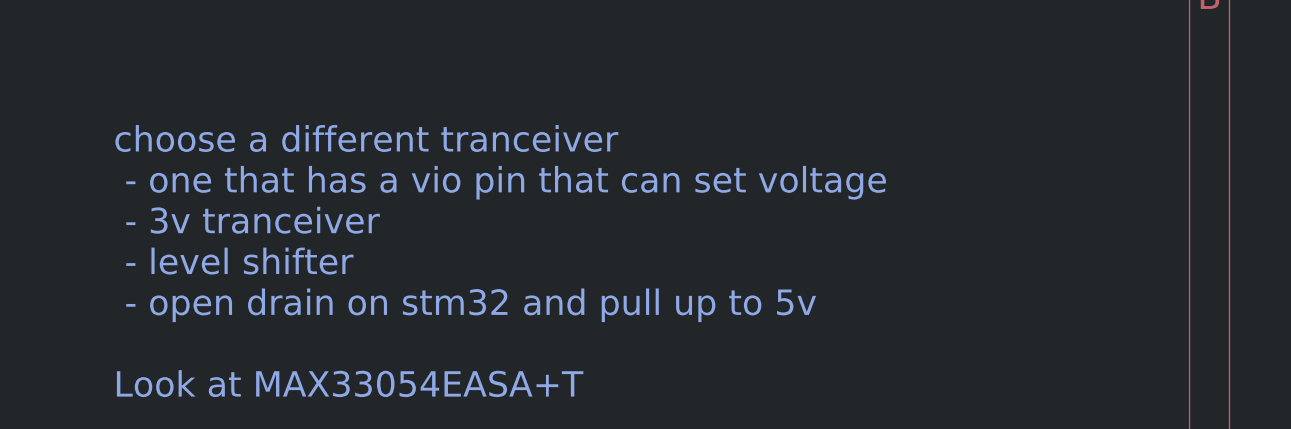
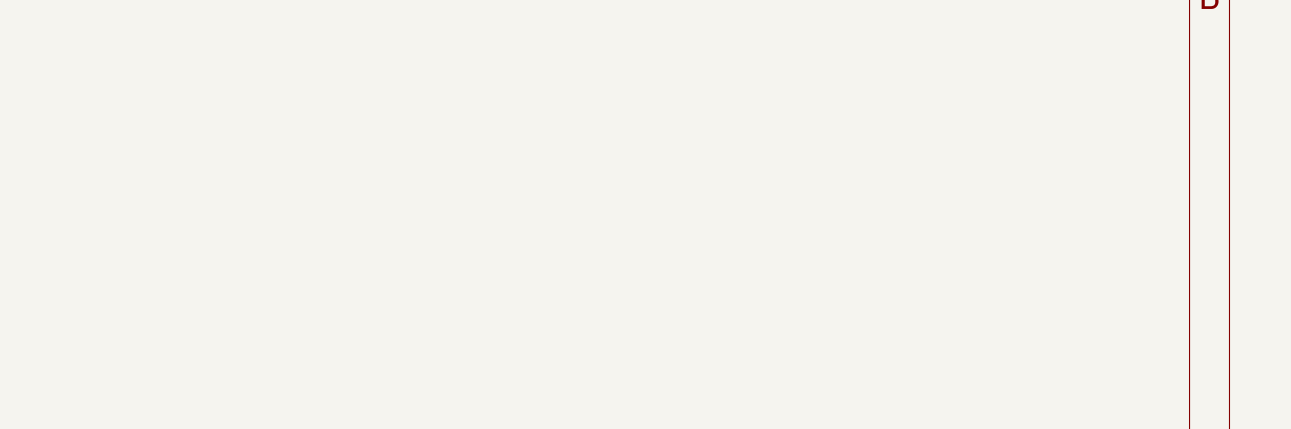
text: choose a different tranceiver (366, 138) -> none
text: - one that has a vio pin that can set voltage (506, 182) -> none
text: - 3v tranceiver (253, 220) -> none
text: - level shifter (239, 261) -> none
text: - open drain on stm32 and pull up to 5v (471, 305) -> none
text: Look at MAX33054EASA+T (350, 383) -> none

